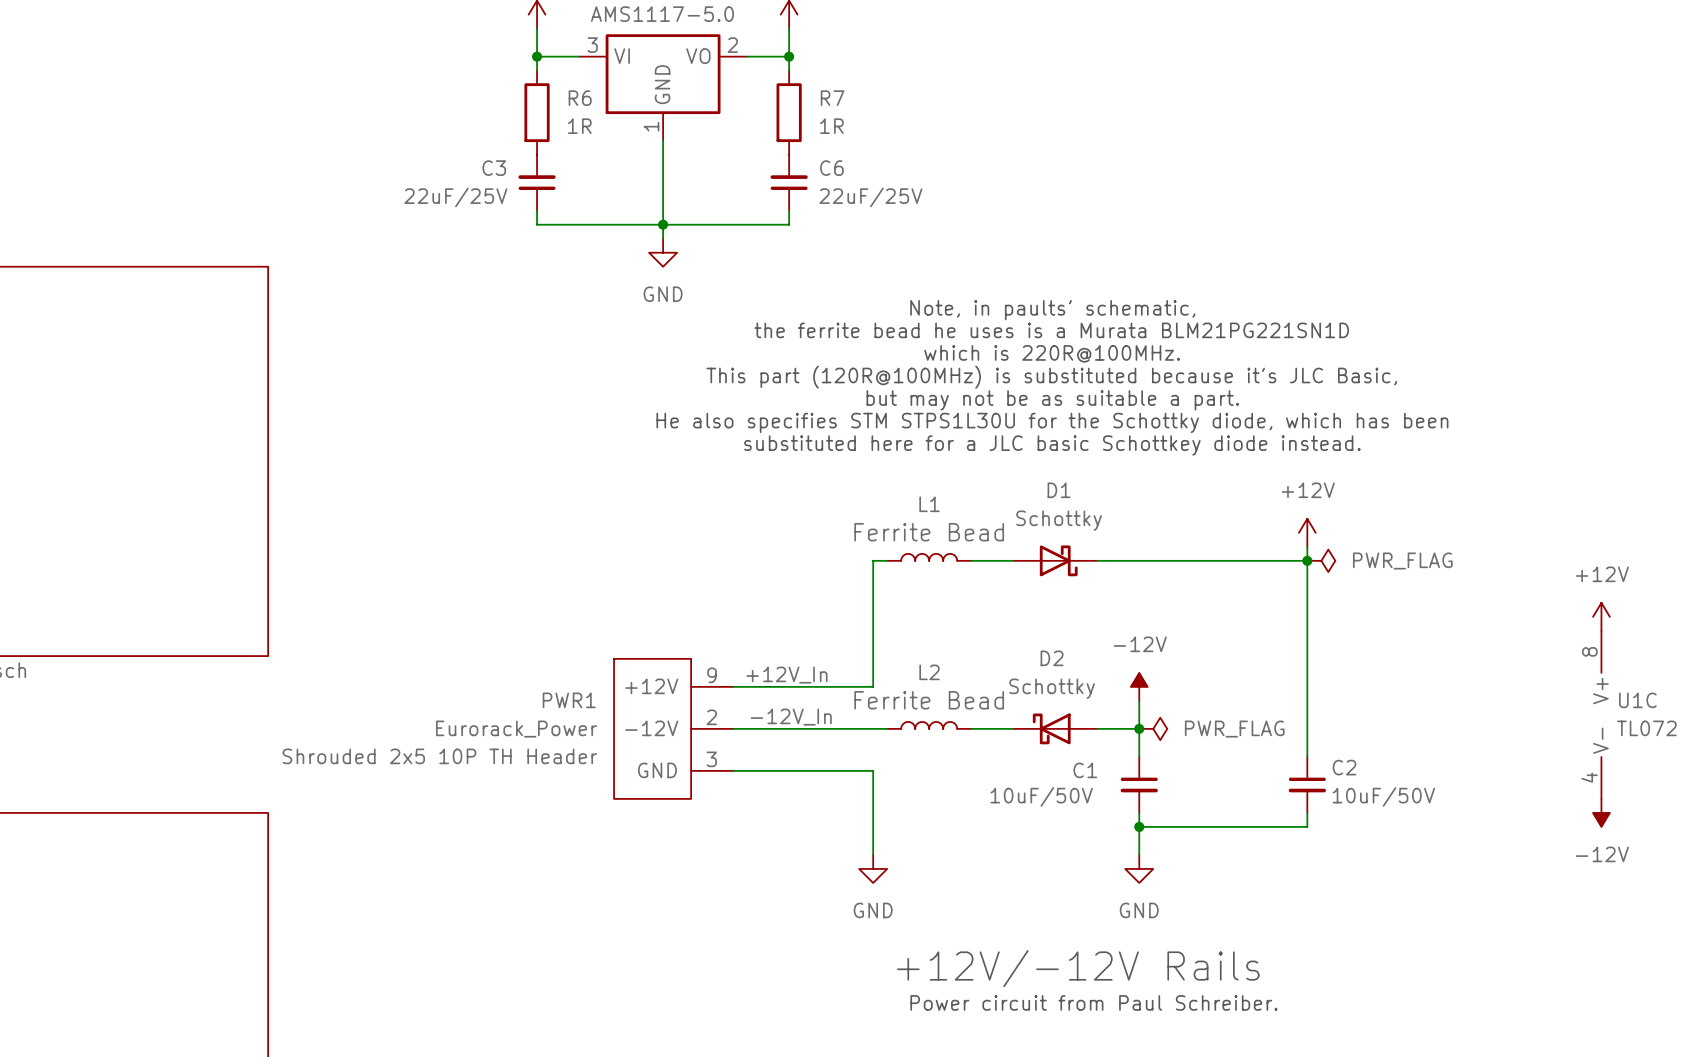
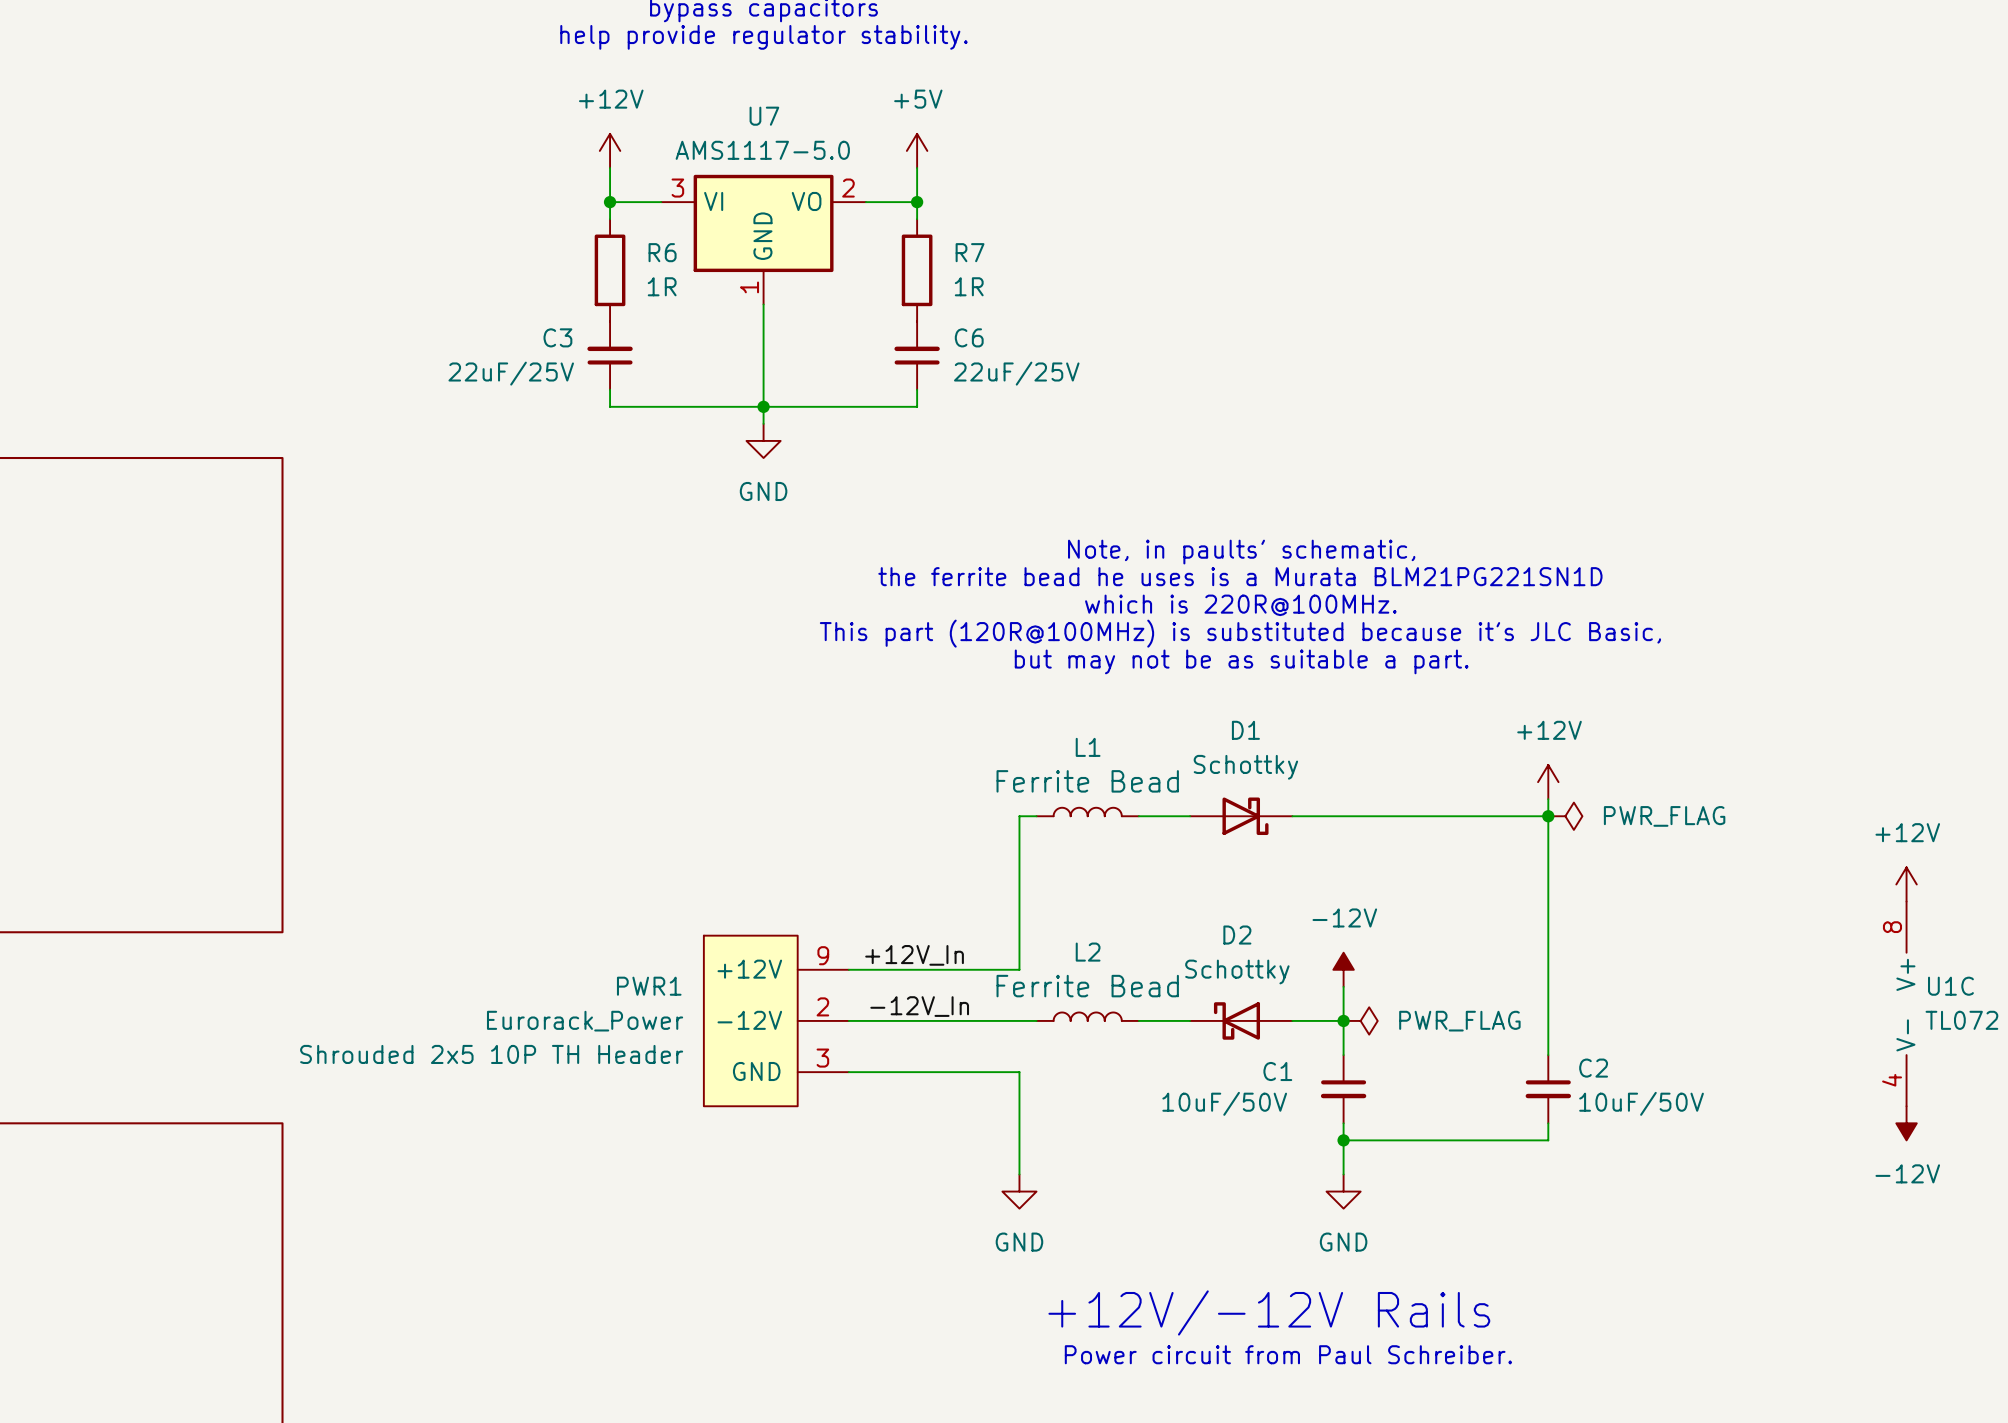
text position: Note, in paults' schematic, (1052, 310) -> Note, in paults' schematic, (1241, 552)
text position: the ferrite bead he uses is a Murata BLM21PG221SN1D (1051, 330) -> the ferrite bead he uses is a Murata BLM21PG221SN1D (1240, 576)
text position: which is 220R@100MHz. (1052, 353) -> which is 220R@100MHz. (1240, 605)
text position: This part (120R@100MHz) is substituted because it's JLC Basic, (1051, 377) -> This part (120R@100MHz) is substituted because it's JLC Basic, (1240, 633)
text position: but may not be as suitable a part. (1052, 400) -> but may not be as suitable a part. (1241, 661)
text: He also specifies STM STPS1L30U for the Schottky diode, which has been (1052, 422) -> none
text: substituted here for a JLC basic Schottkey diode instead. (1052, 445) -> none

